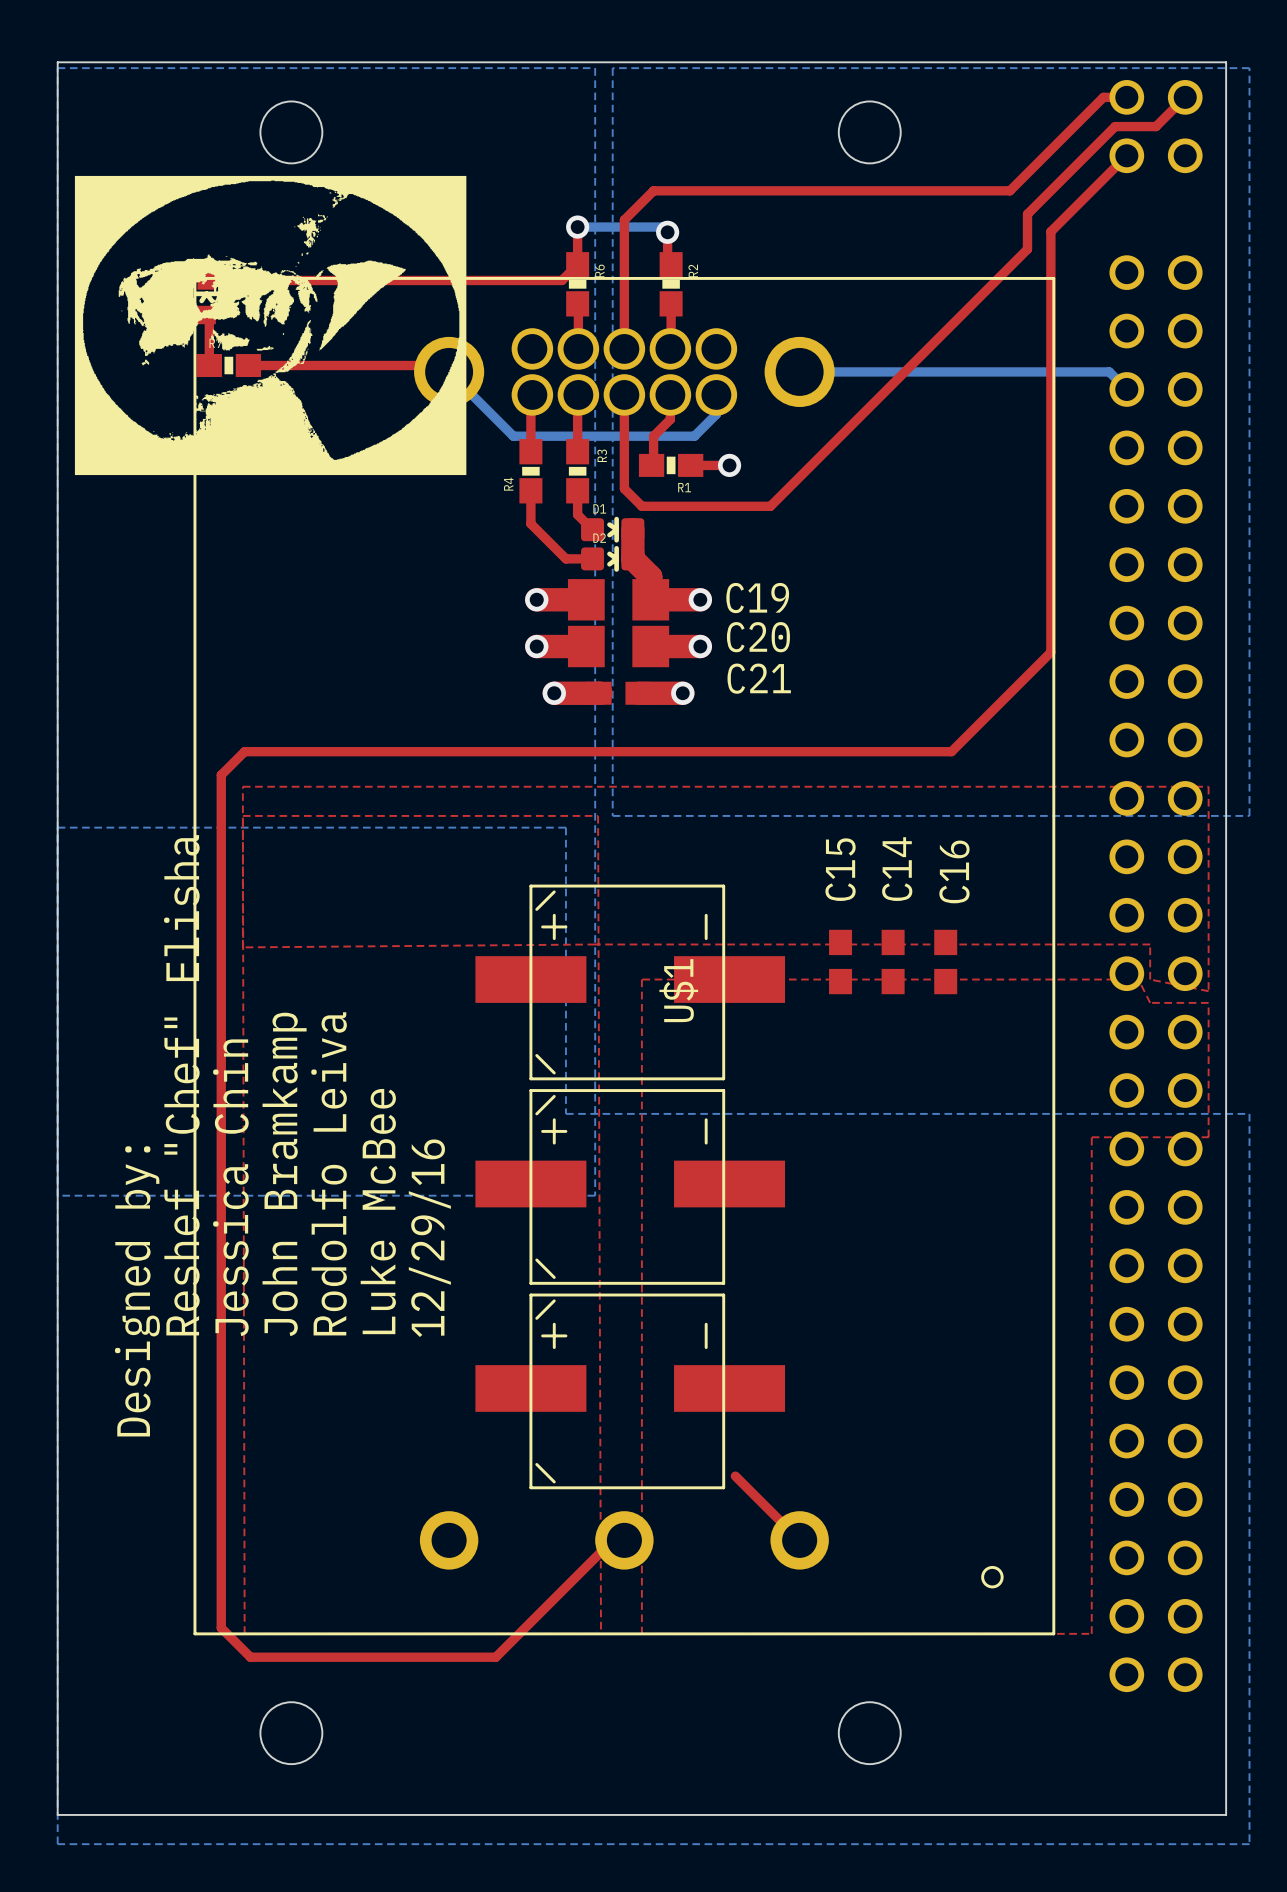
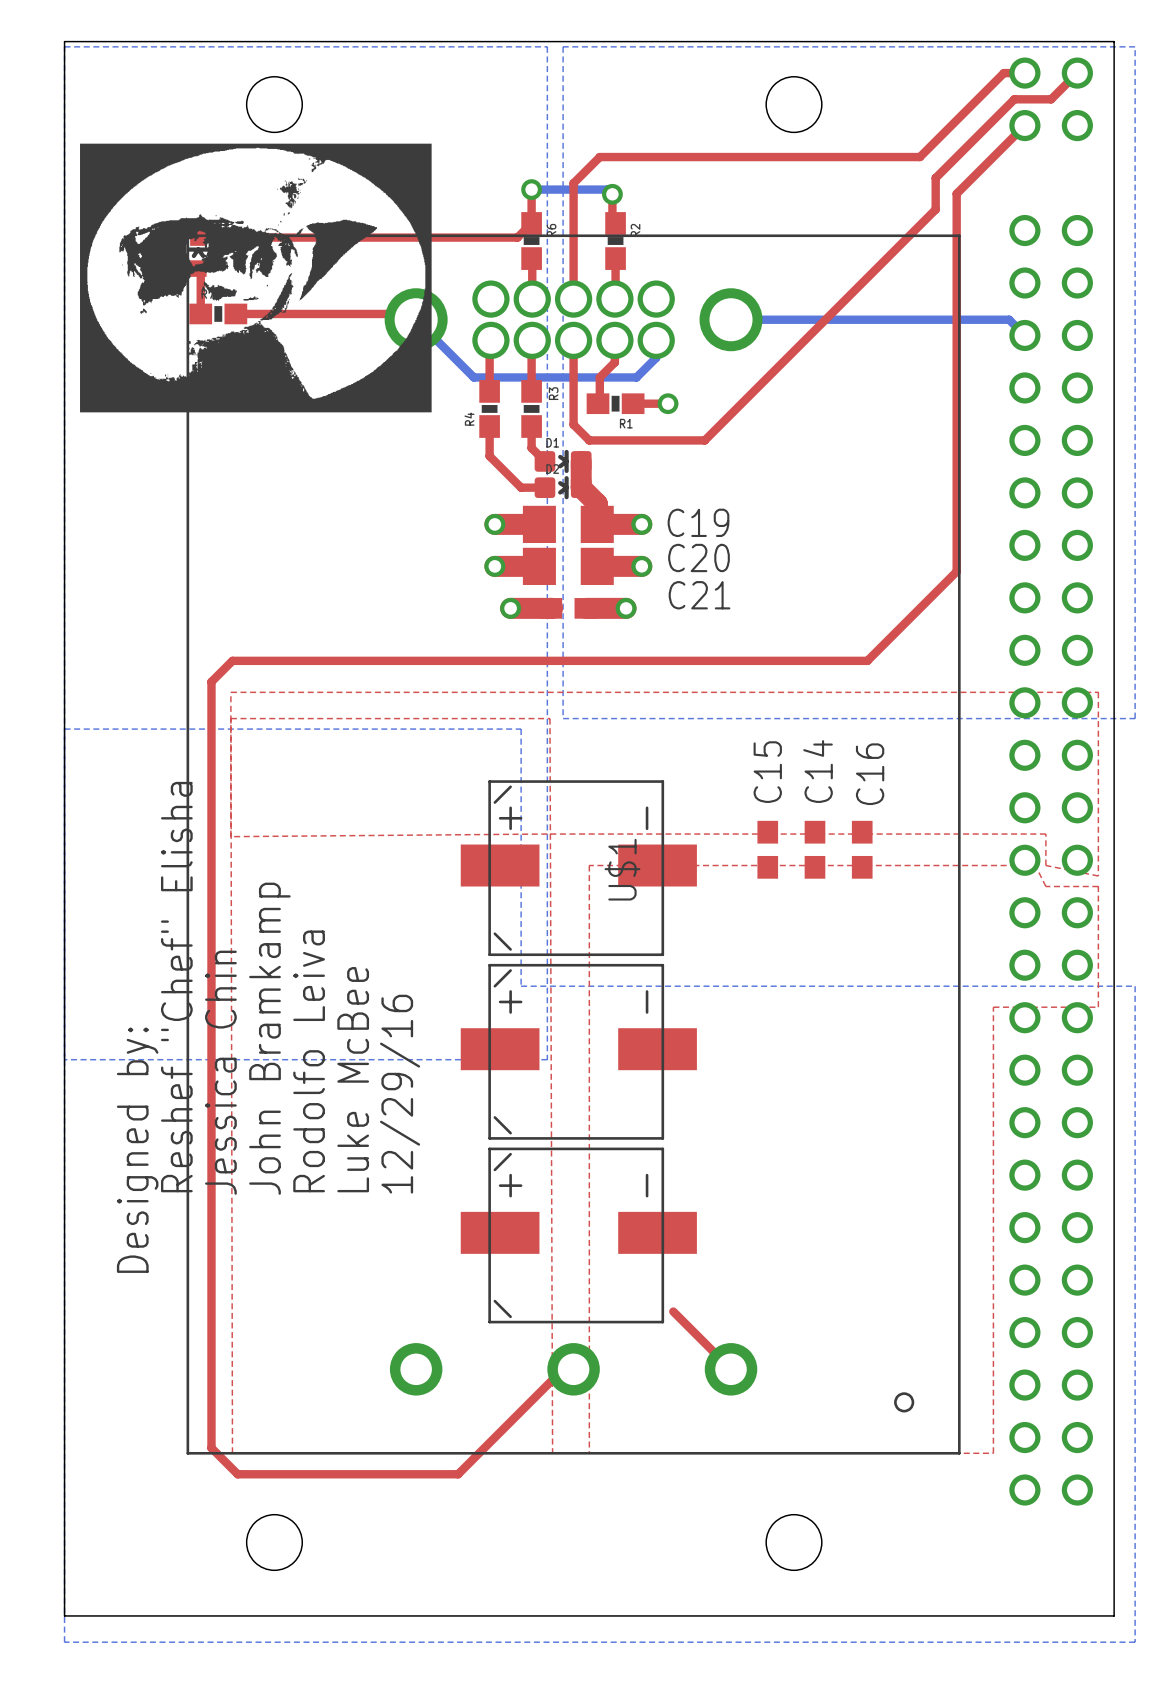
part footprint: [475, 884, 786, 1081] -> [460, 780, 697, 957]
part footprint: [475, 1089, 786, 1285] -> [460, 963, 697, 1140]
part footprint: [475, 1293, 786, 1490] -> [460, 1147, 697, 1324]

